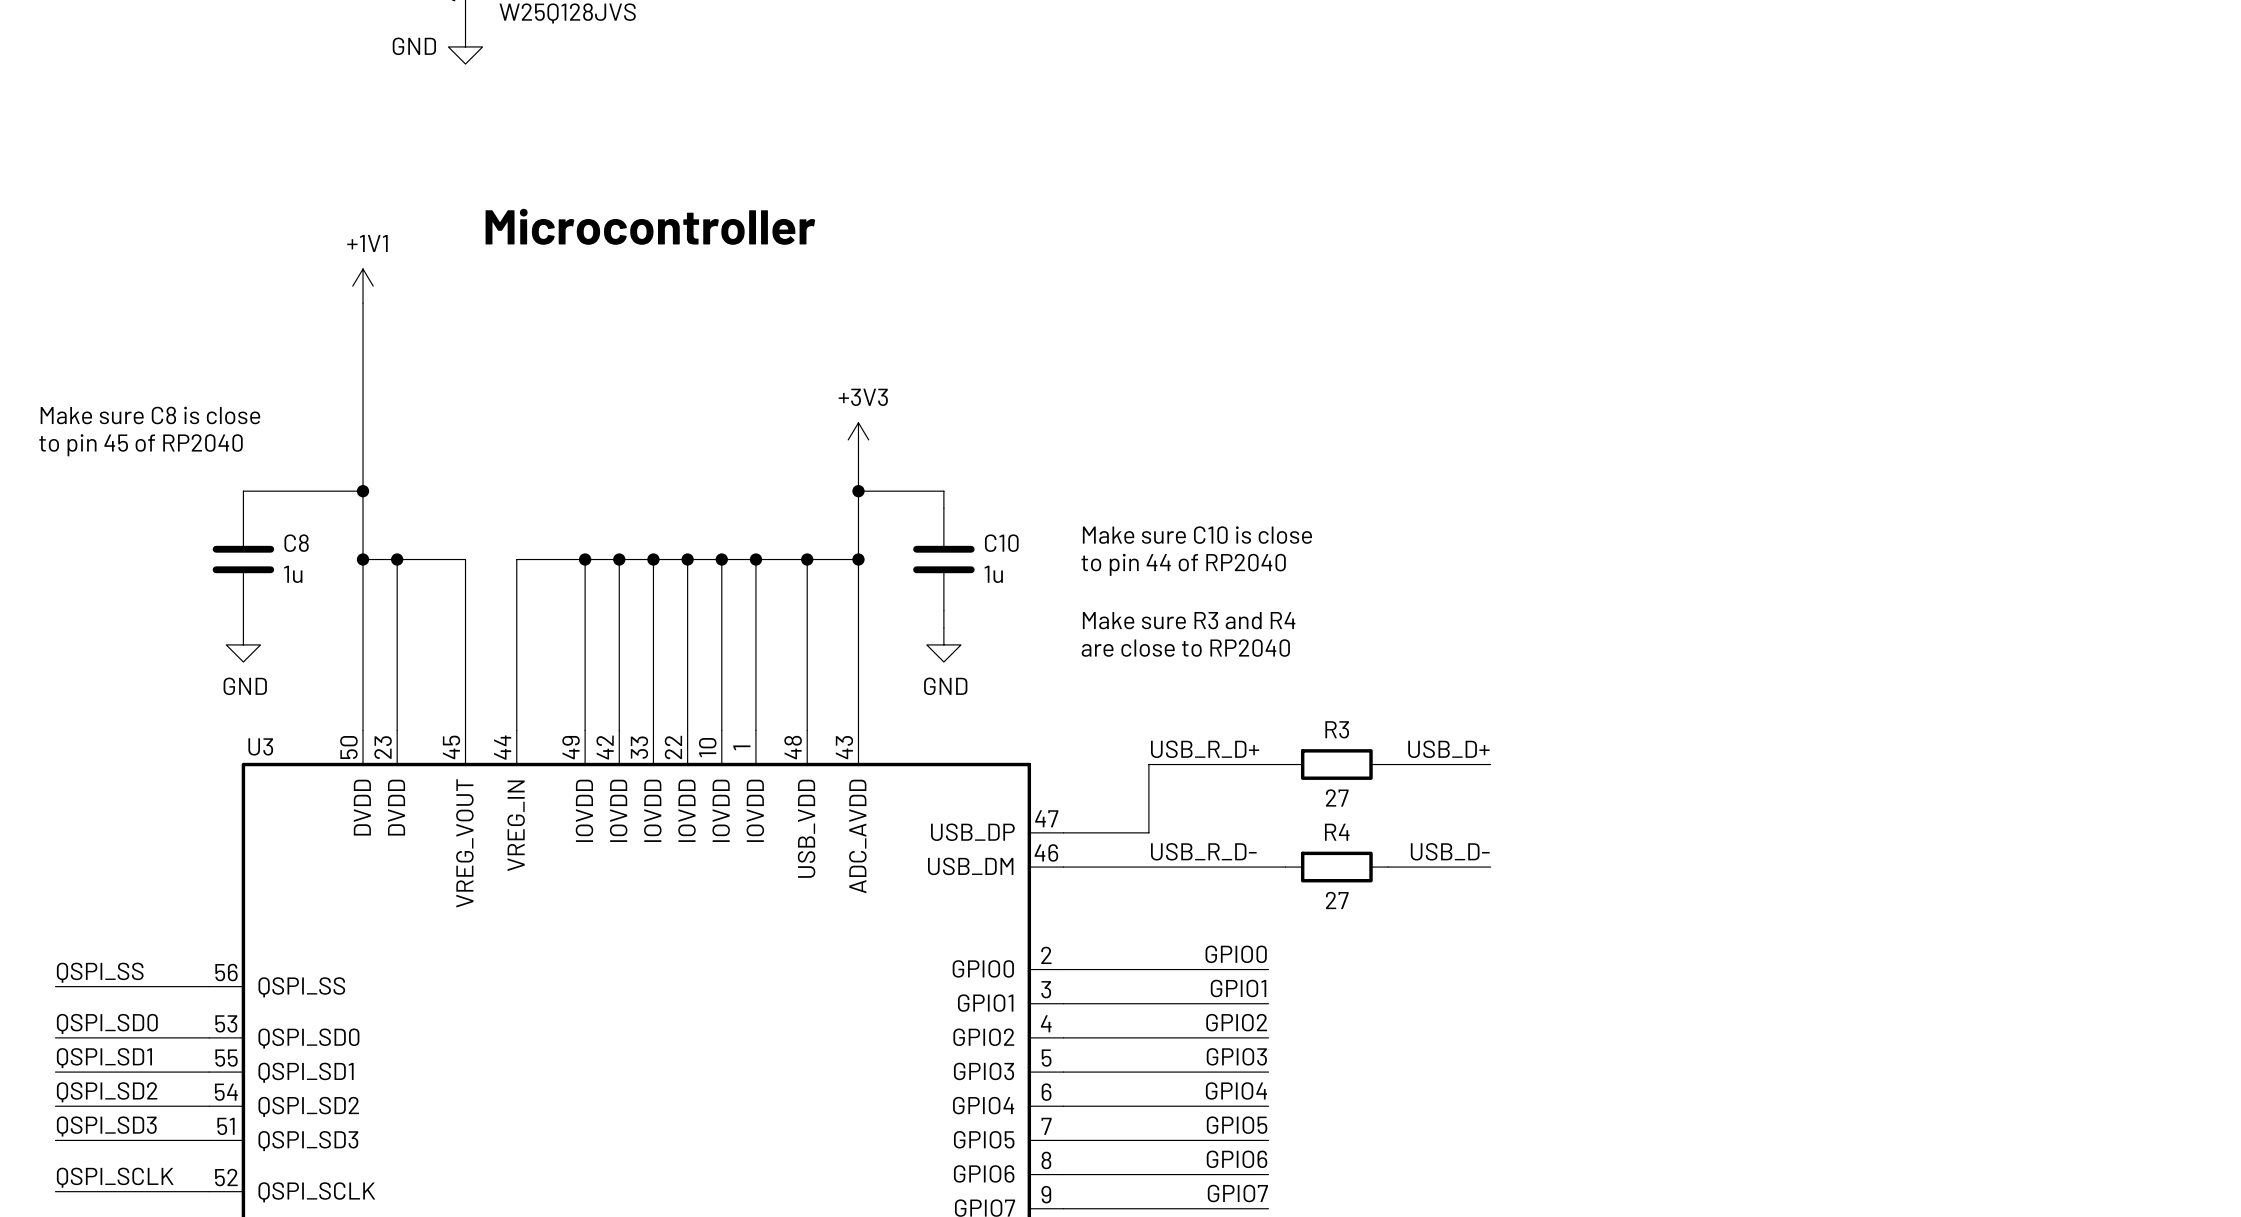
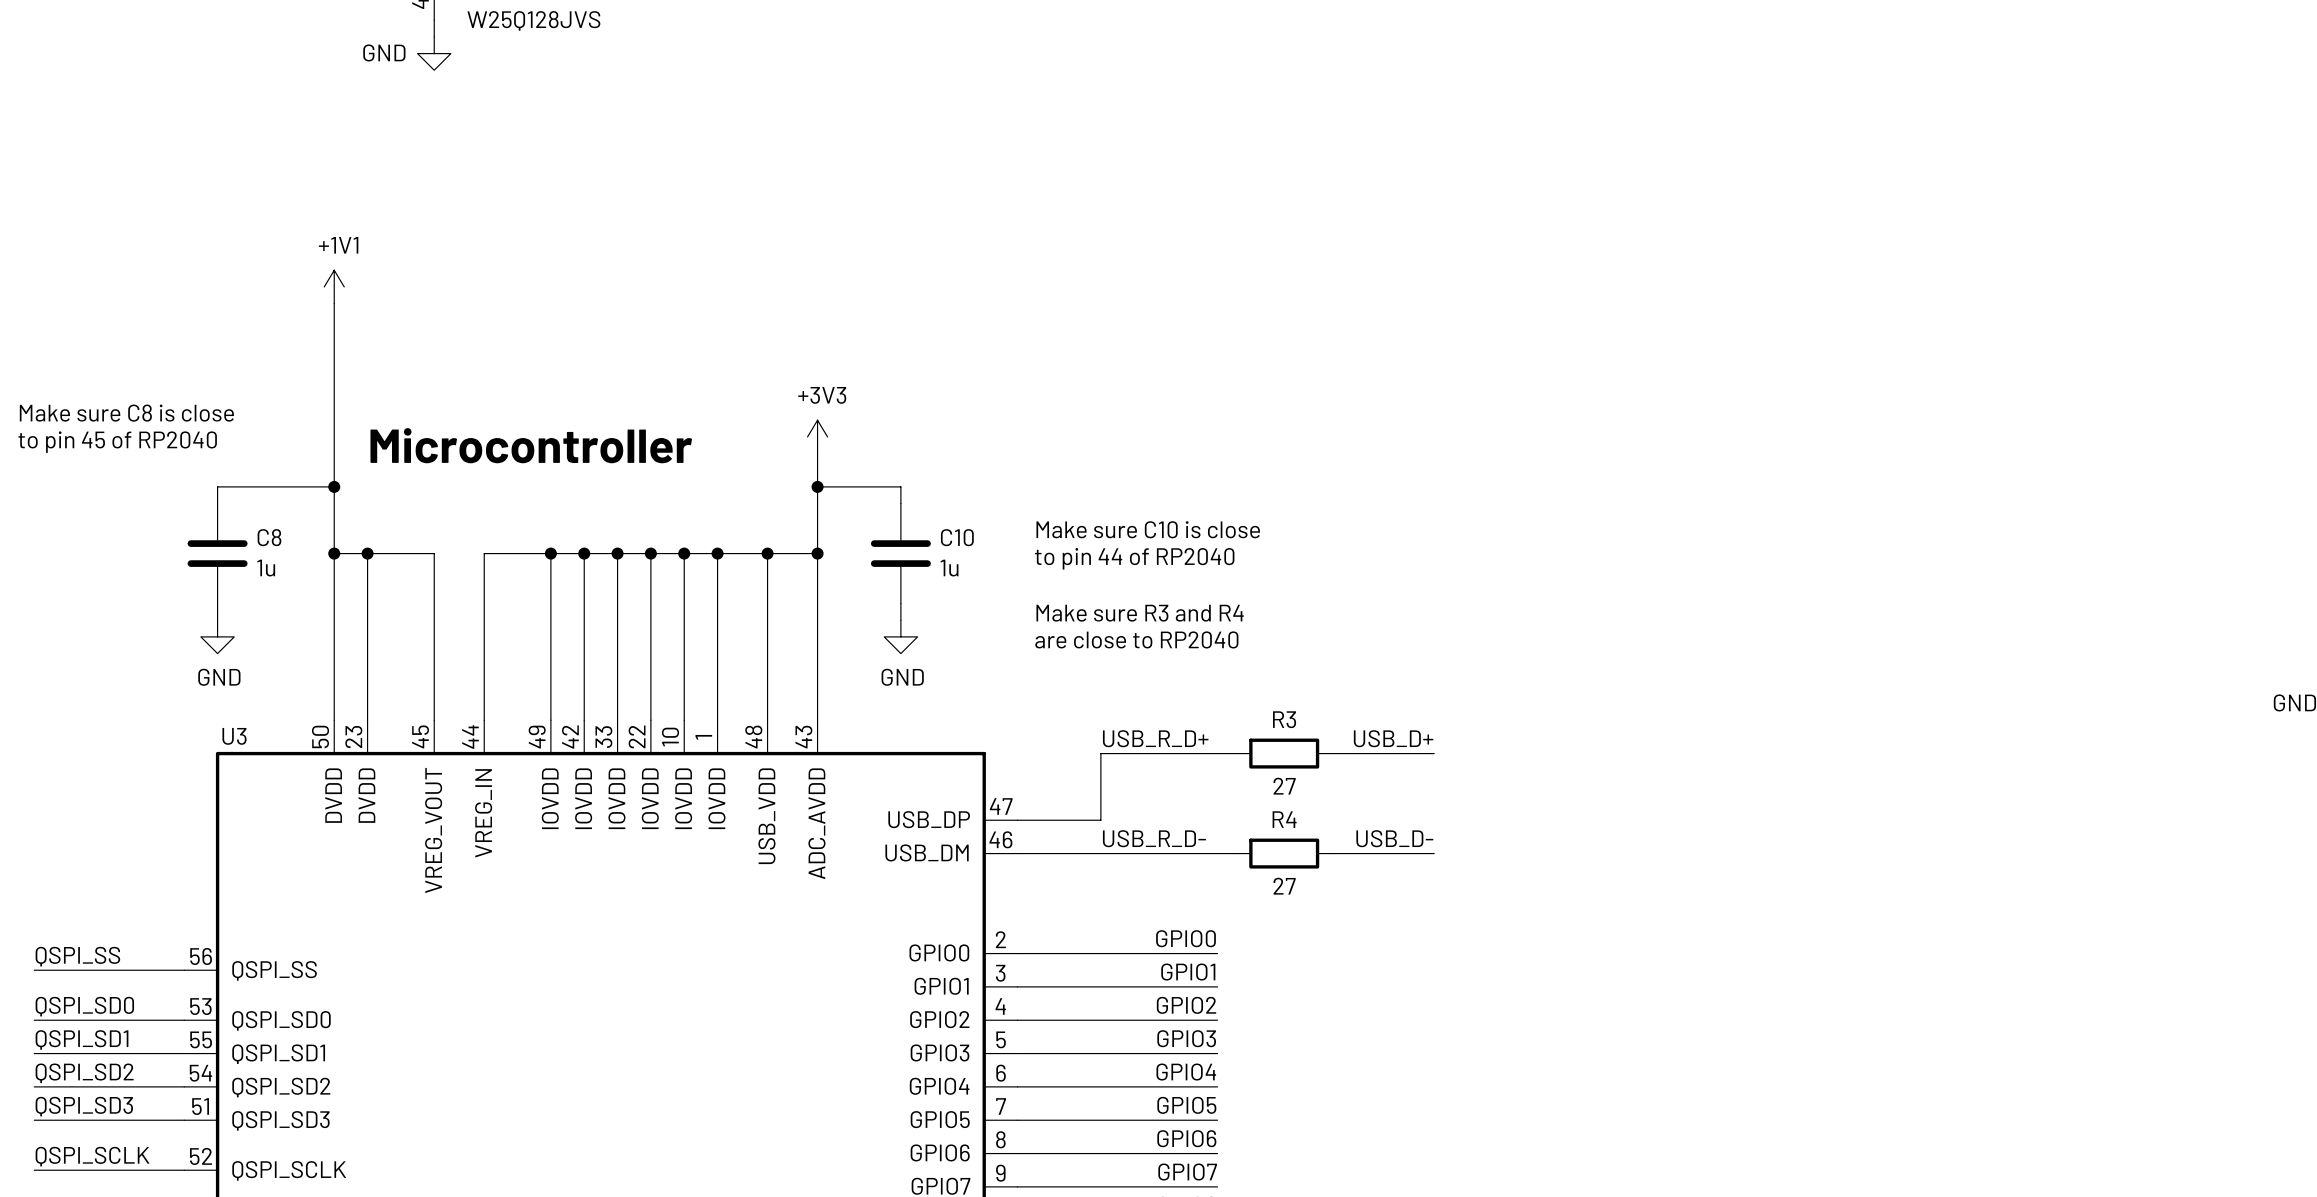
text position: Microcontroller (650, 226) -> Microcontroller (531, 445)

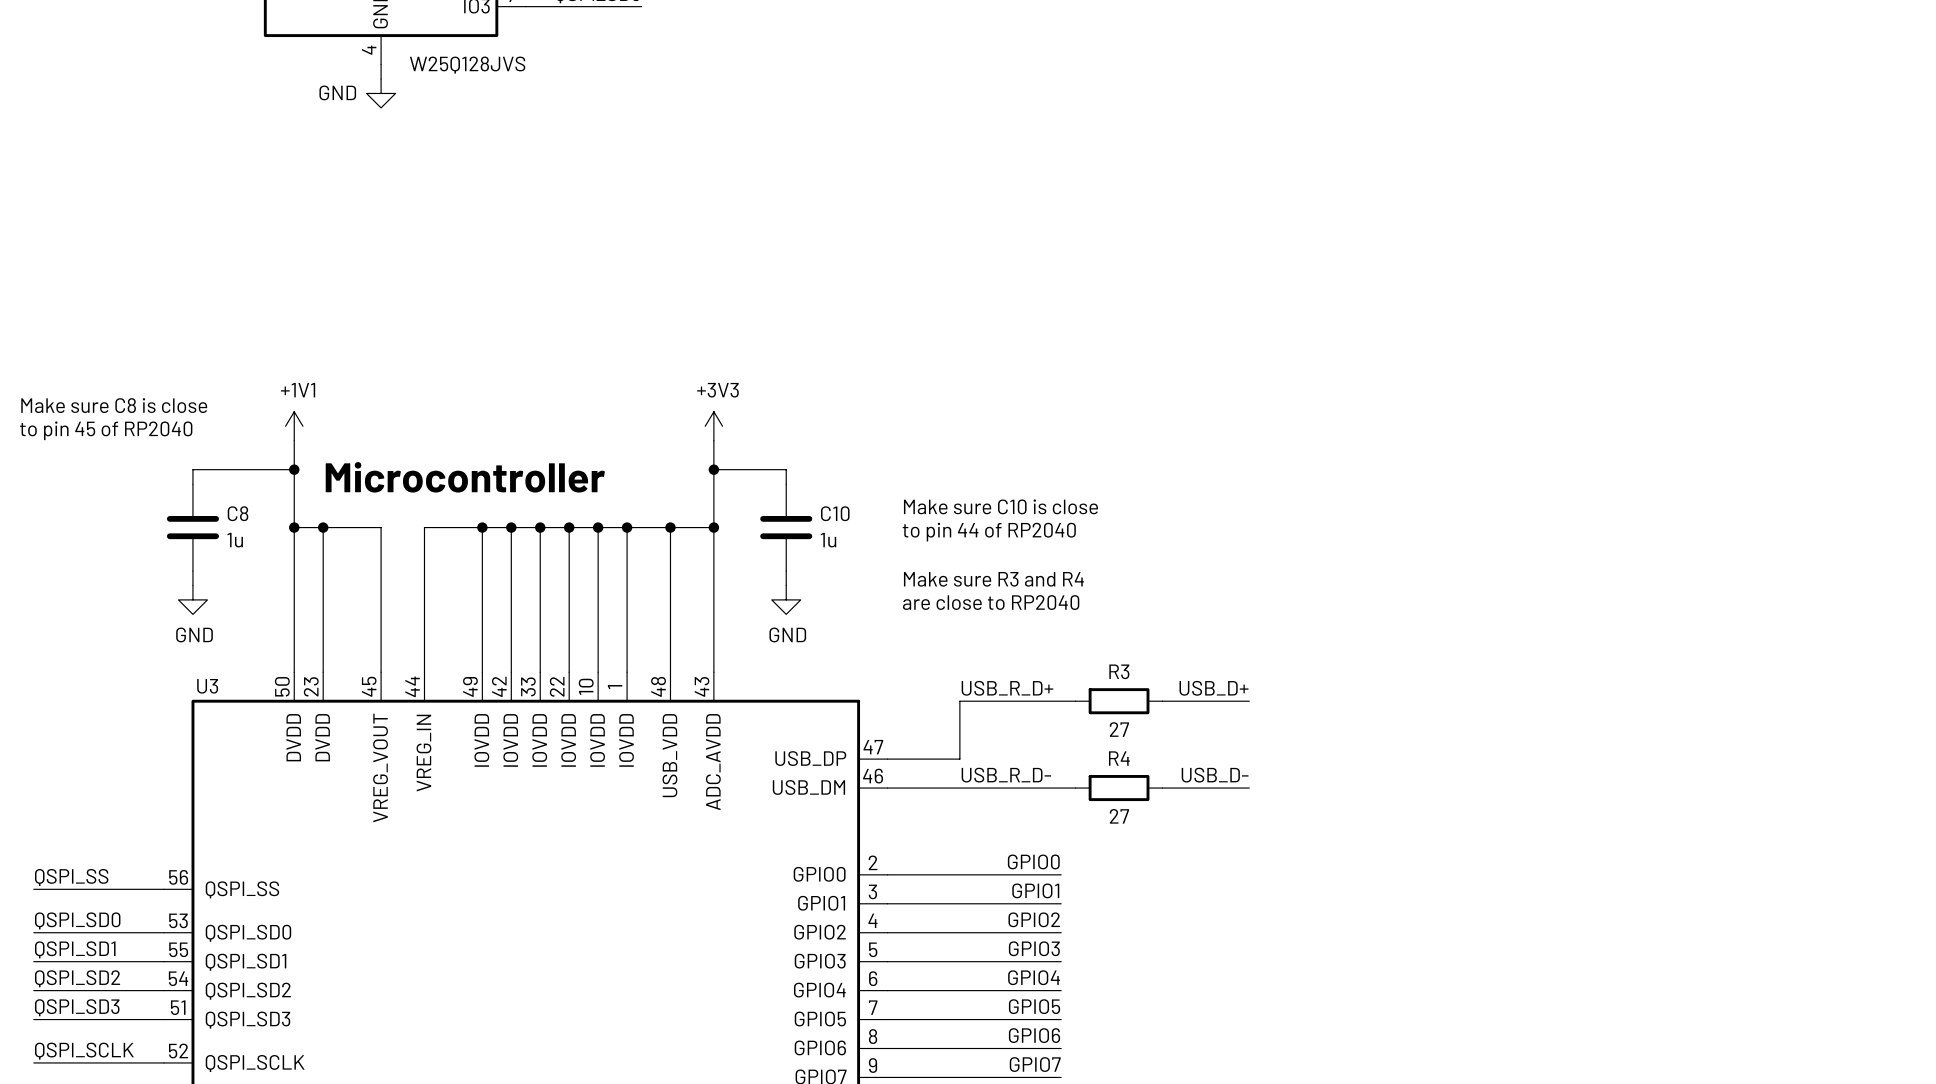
power symbol position: +1V1 (334, 286) -> +1V1 (294, 426)
wire: (334, 303) (334, 453) -> none
text position: Microcontroller (531, 445) -> Microcontroller (465, 477)

